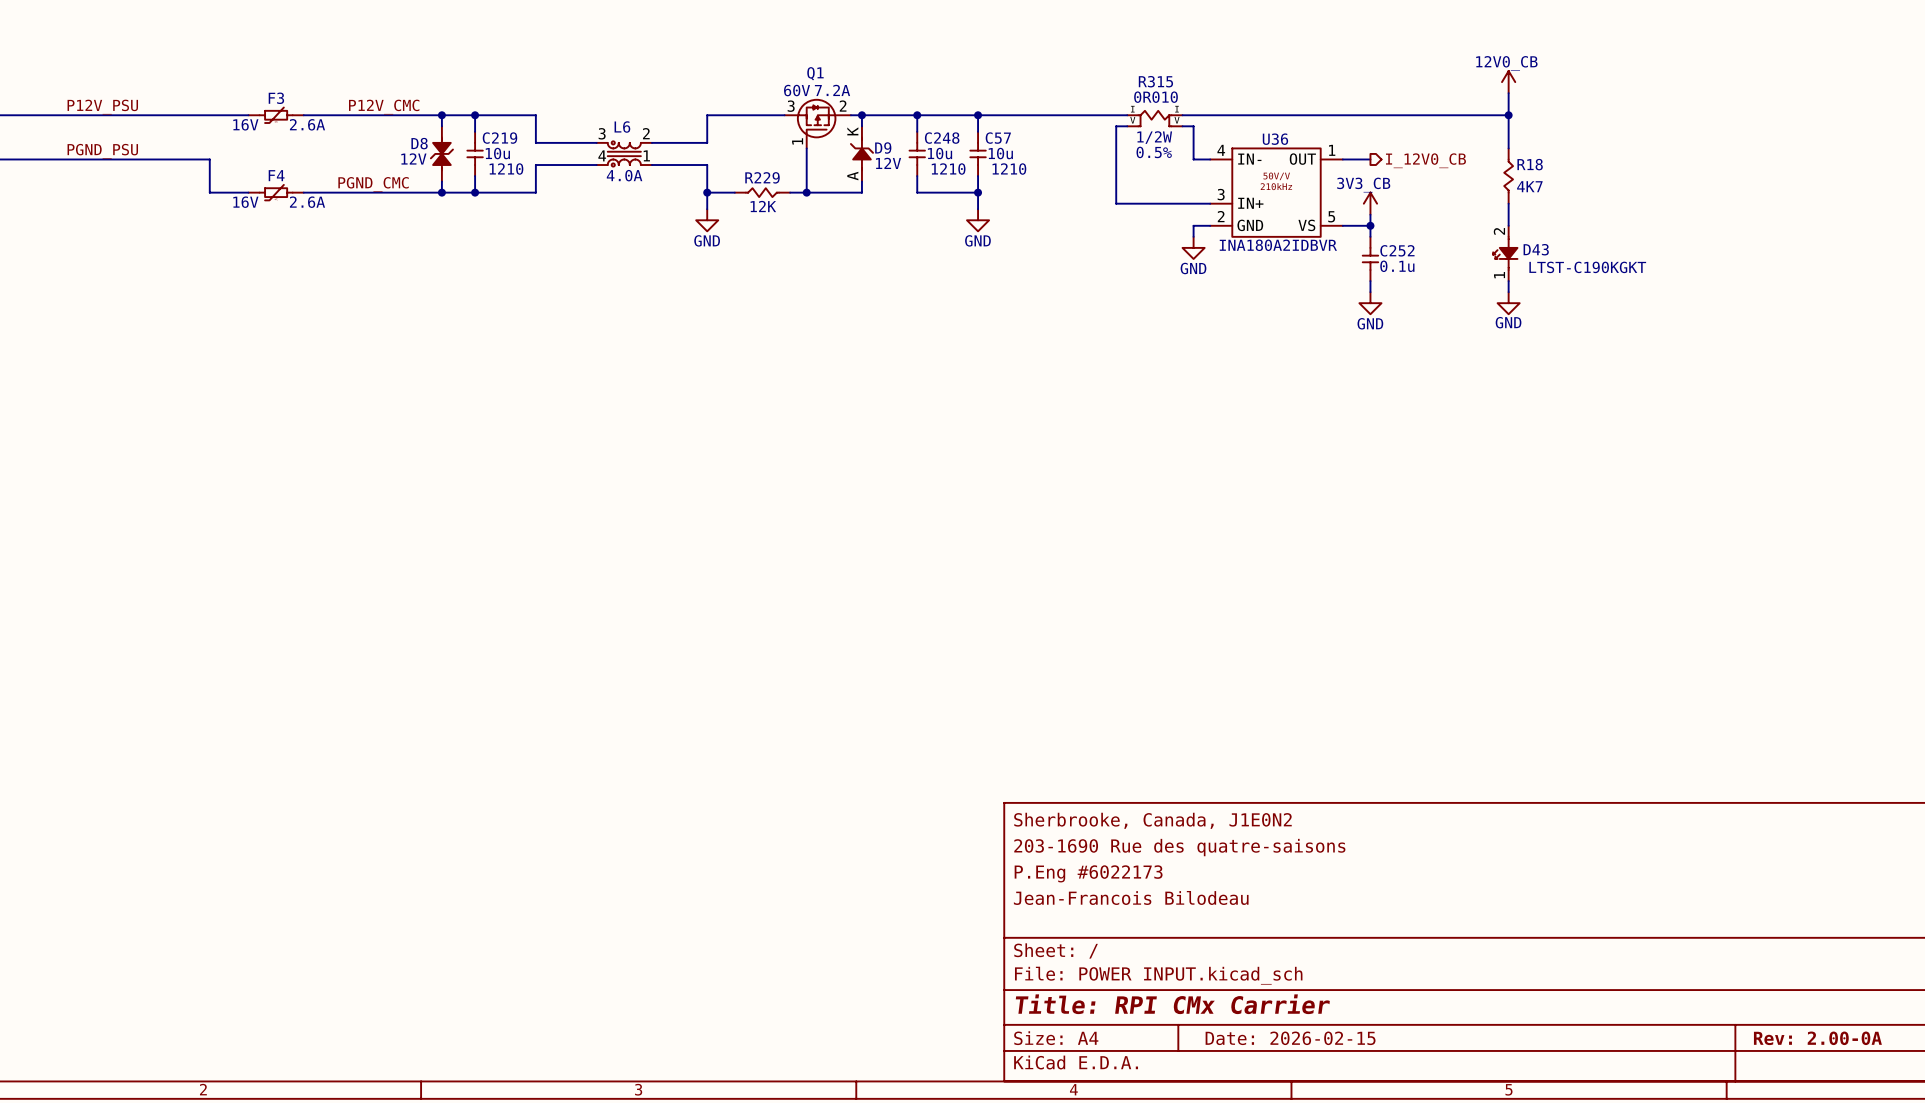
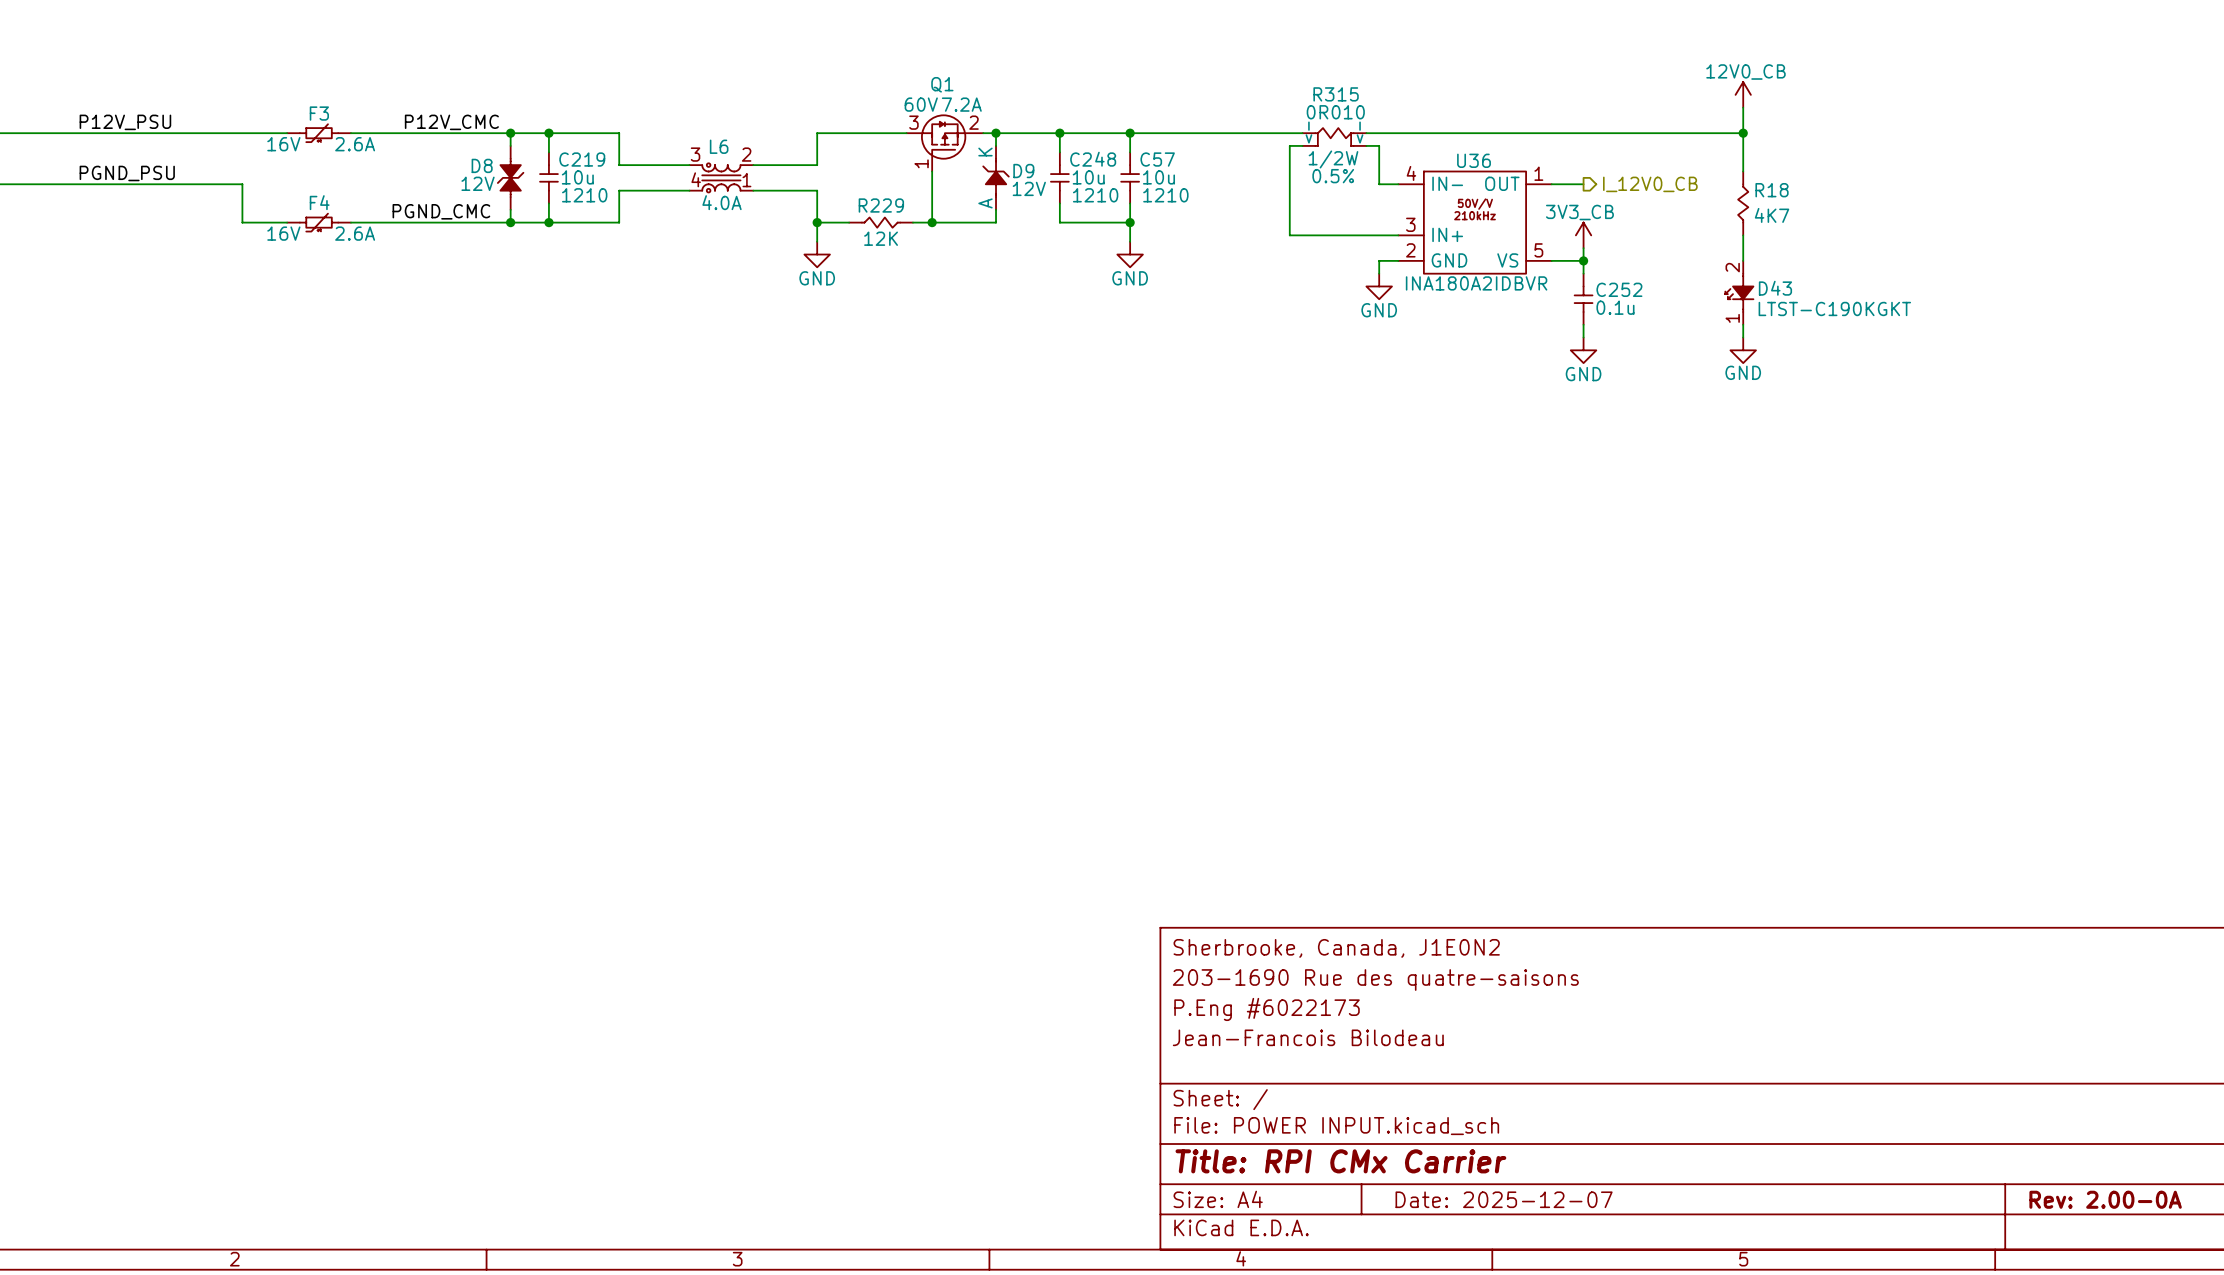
title block: Date: 2026-02-15 (1290, 1038) -> Date: 2025-12-07 (1504, 1199)

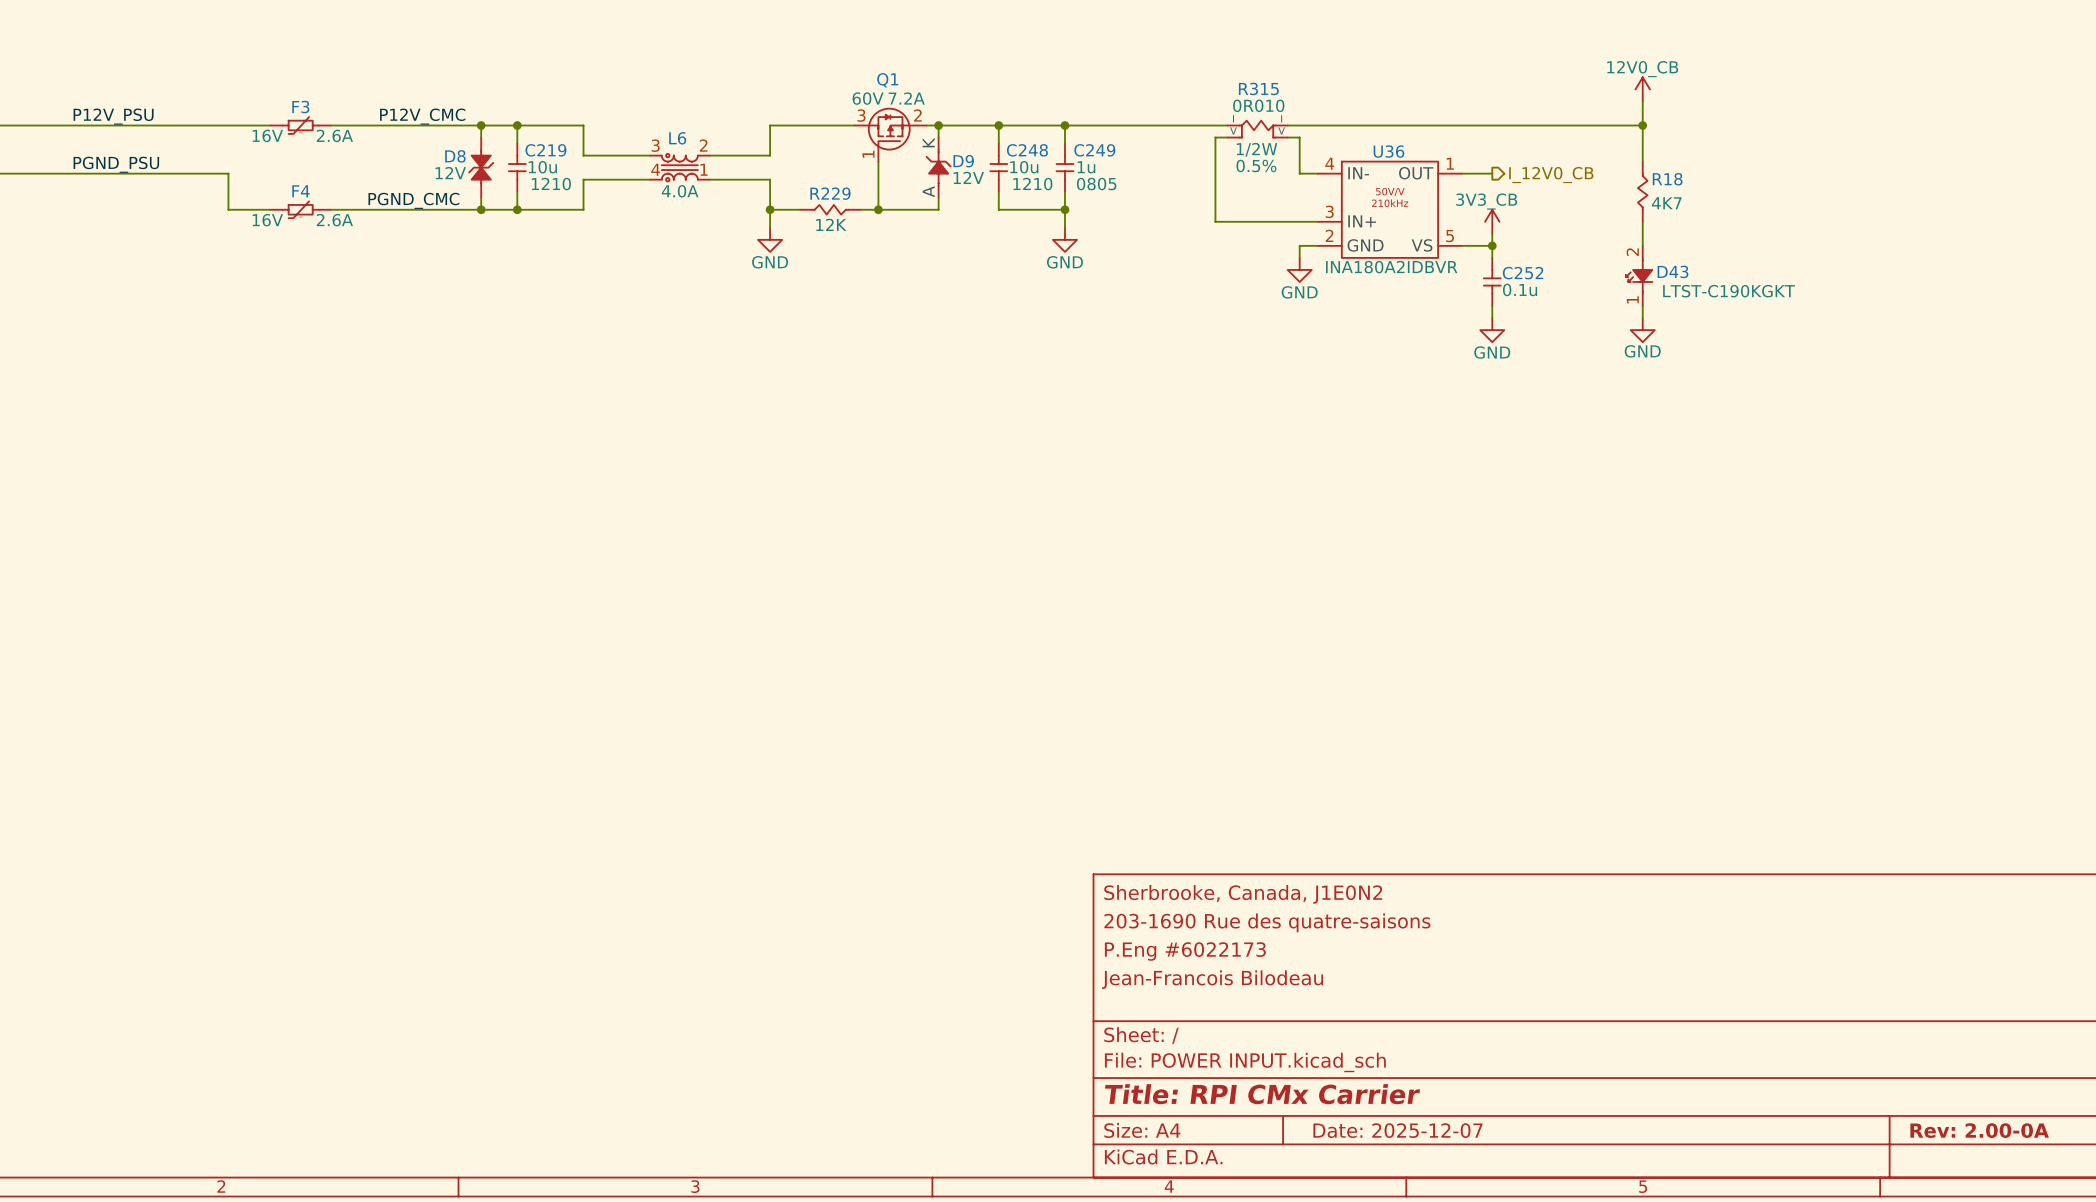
C57 name: C57 (1157, 159) -> C249 (1094, 150)
C57 value: 10u (1158, 177) -> 1u (1086, 167)
C57 text: 1210 (1165, 195) -> 0805 (1096, 184)

